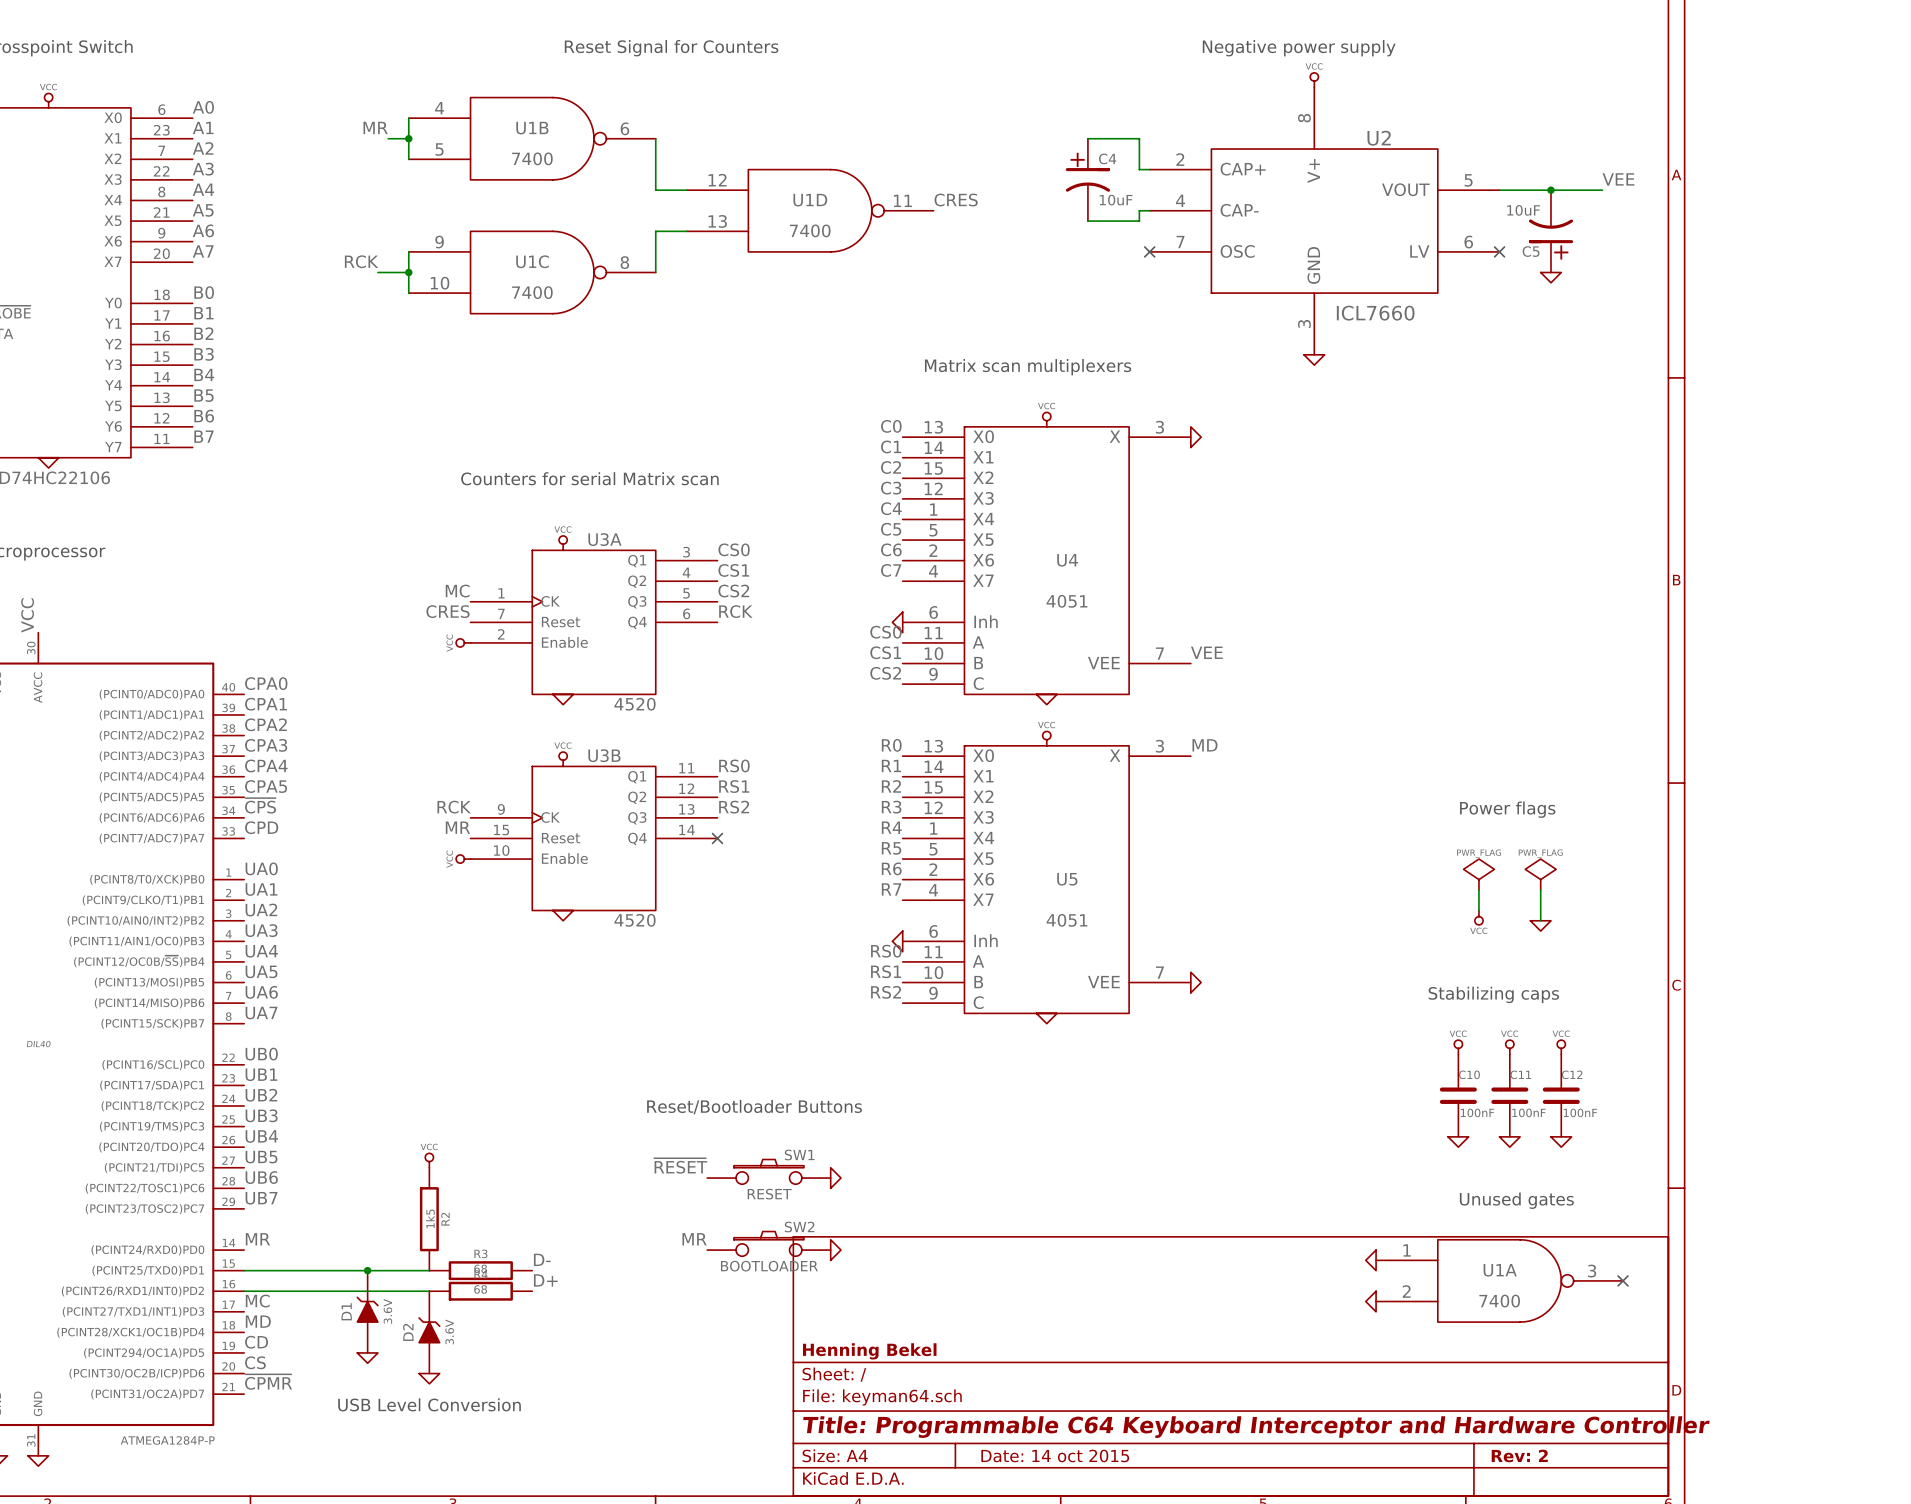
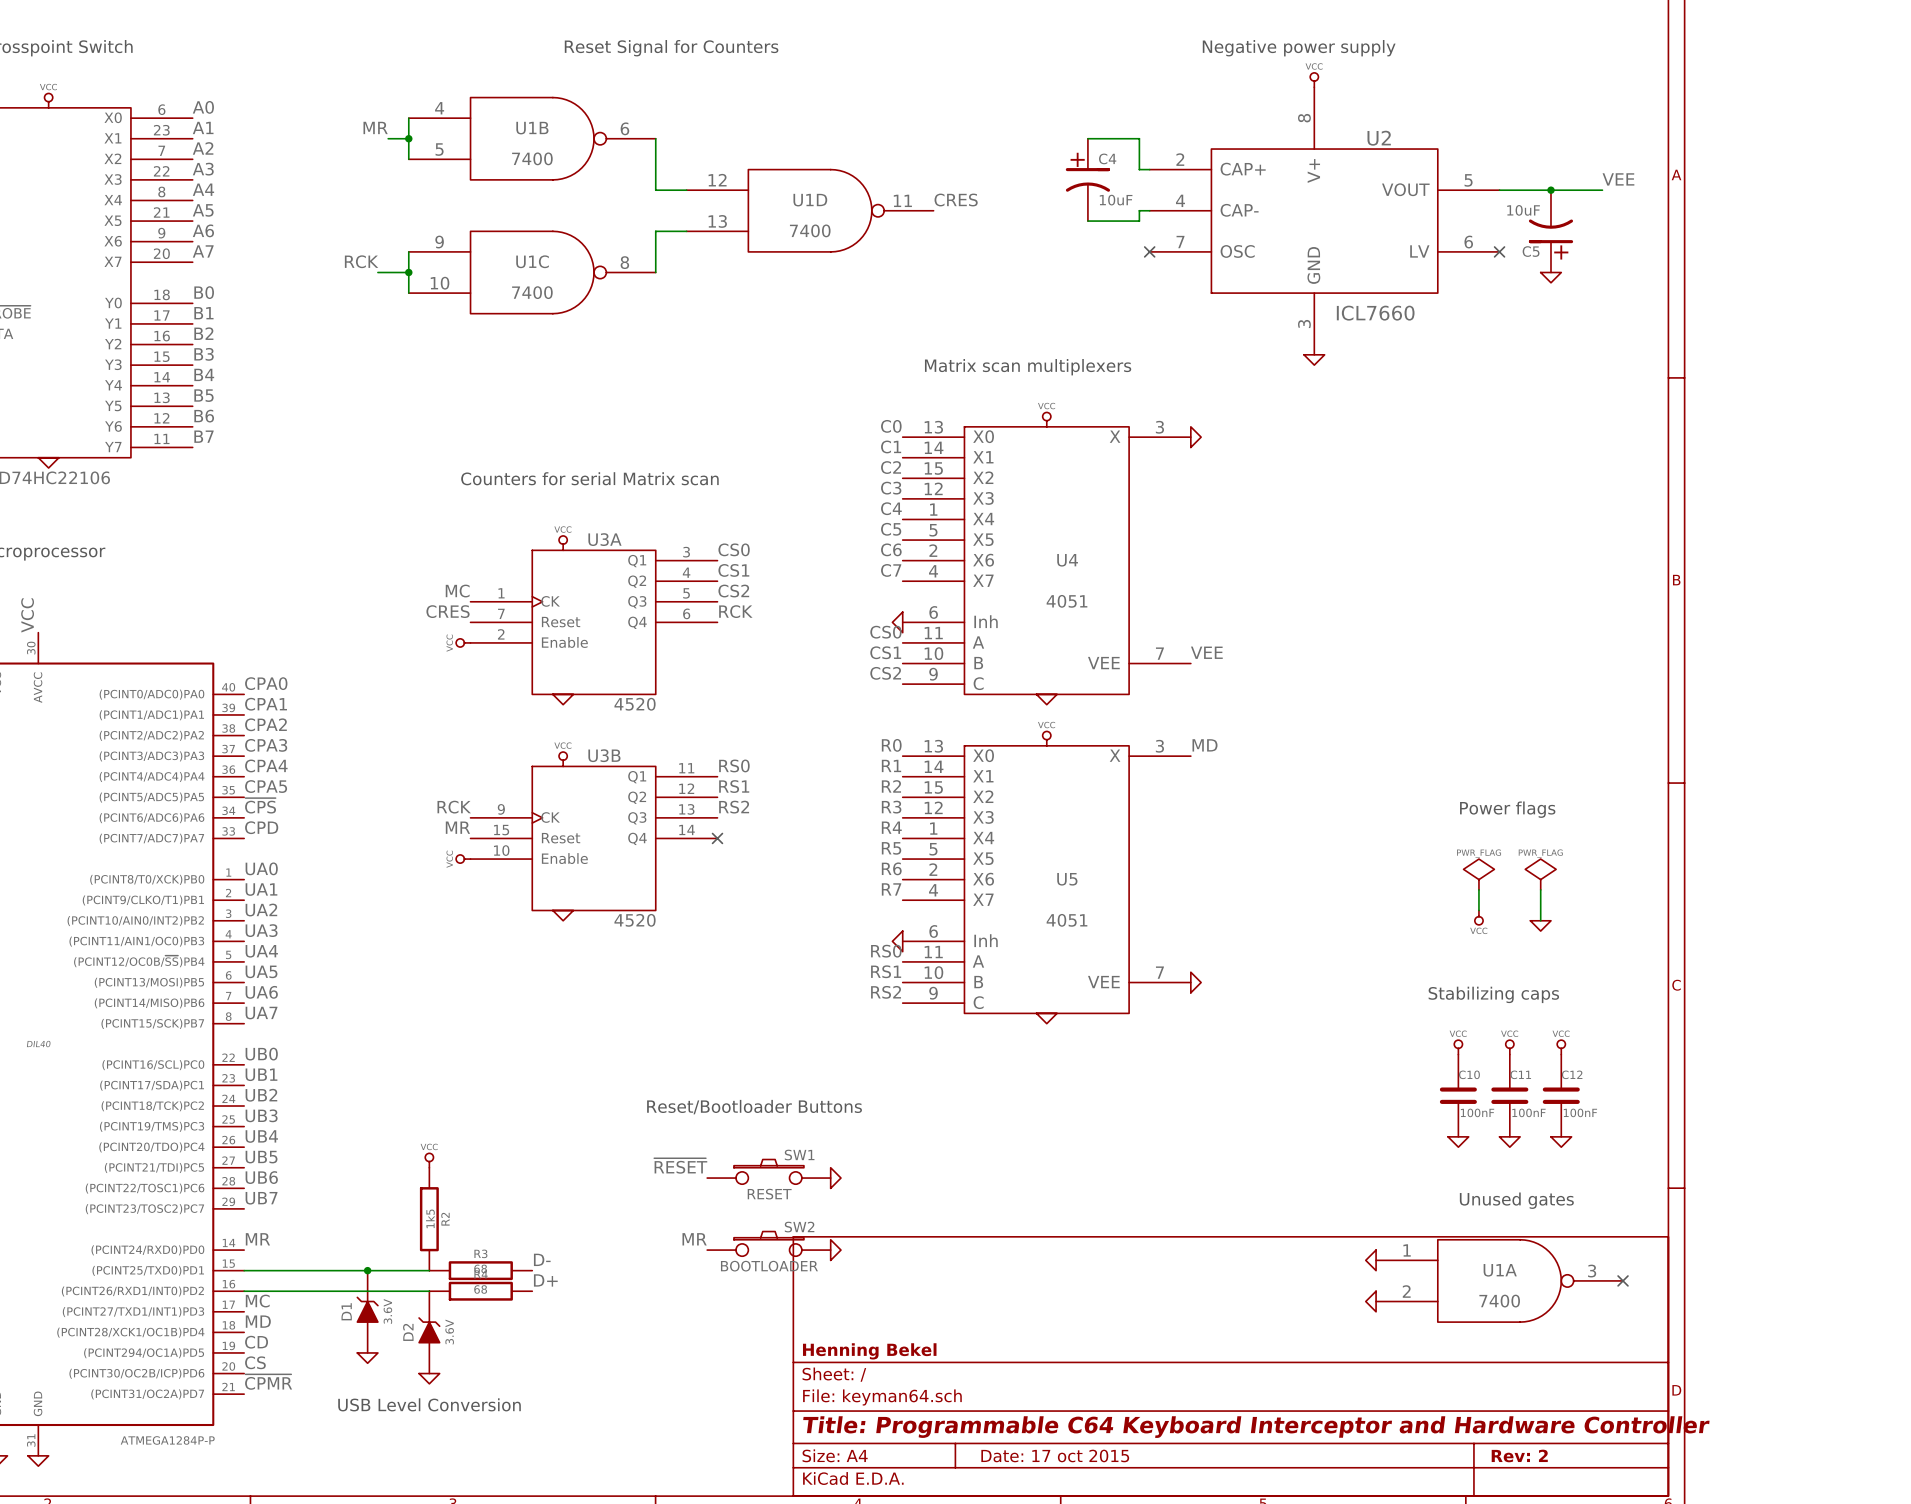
title block: Date: 14 oct 2015 (1055, 1455) -> Date: 17 oct 2015 (1055, 1455)

